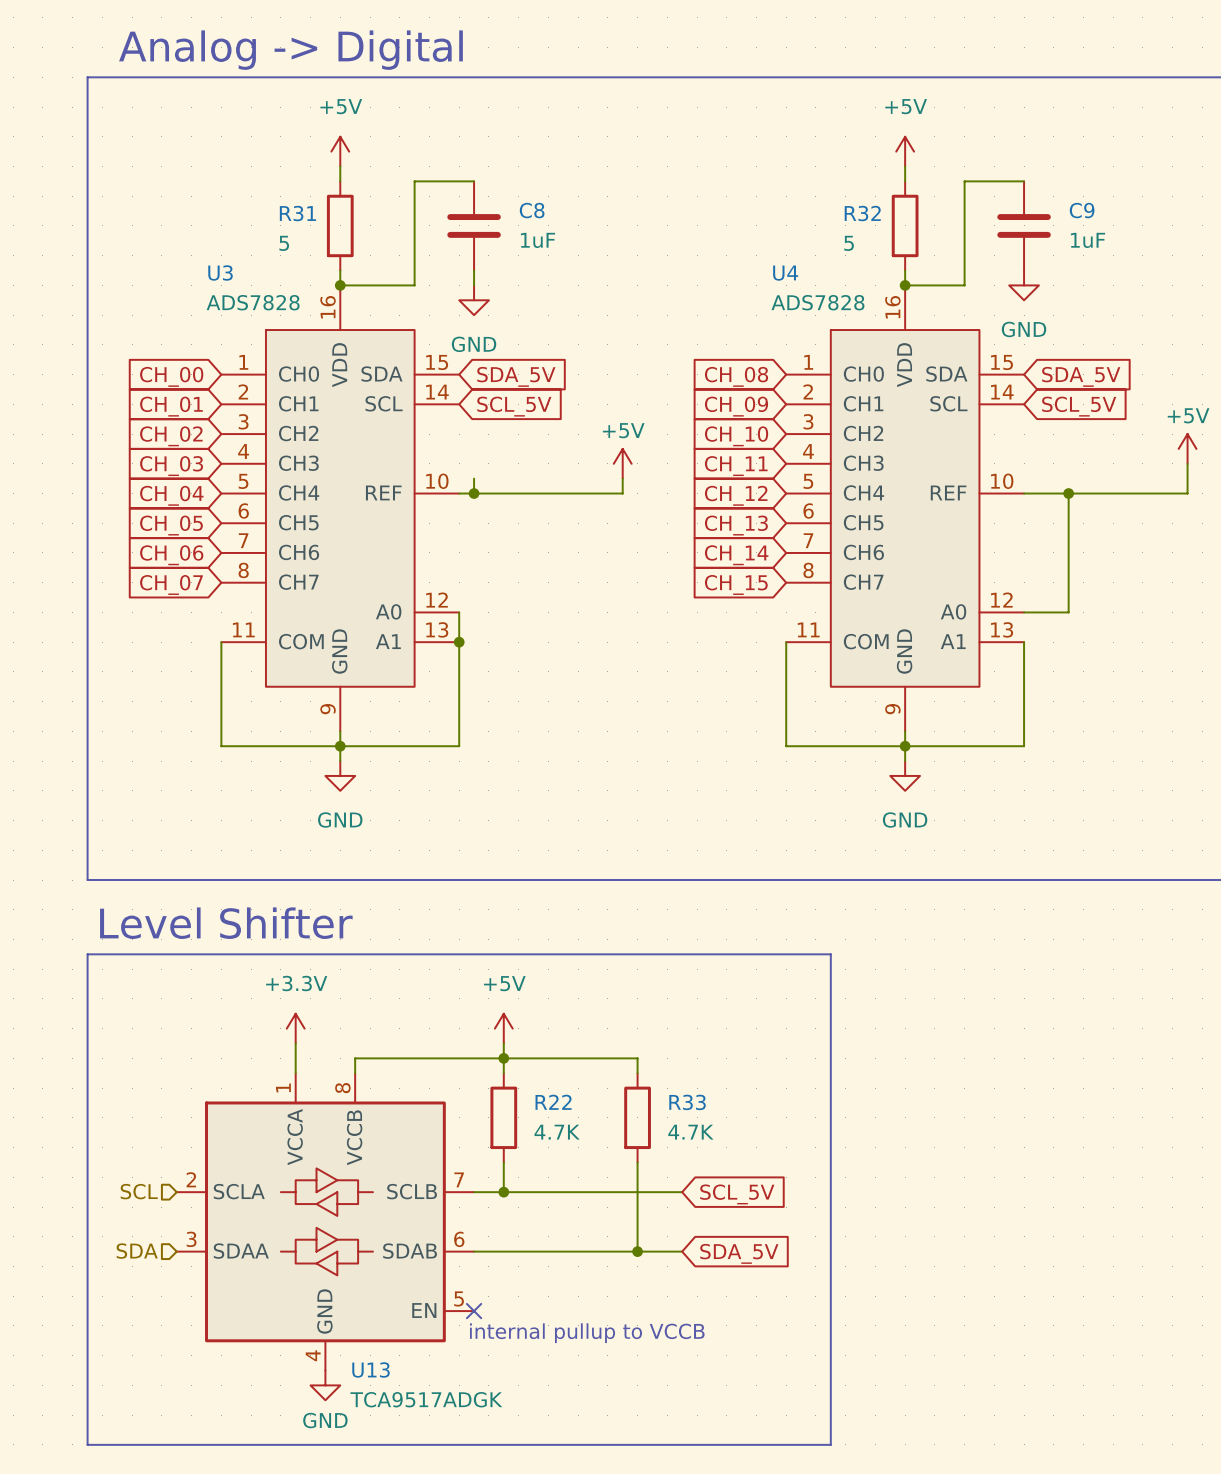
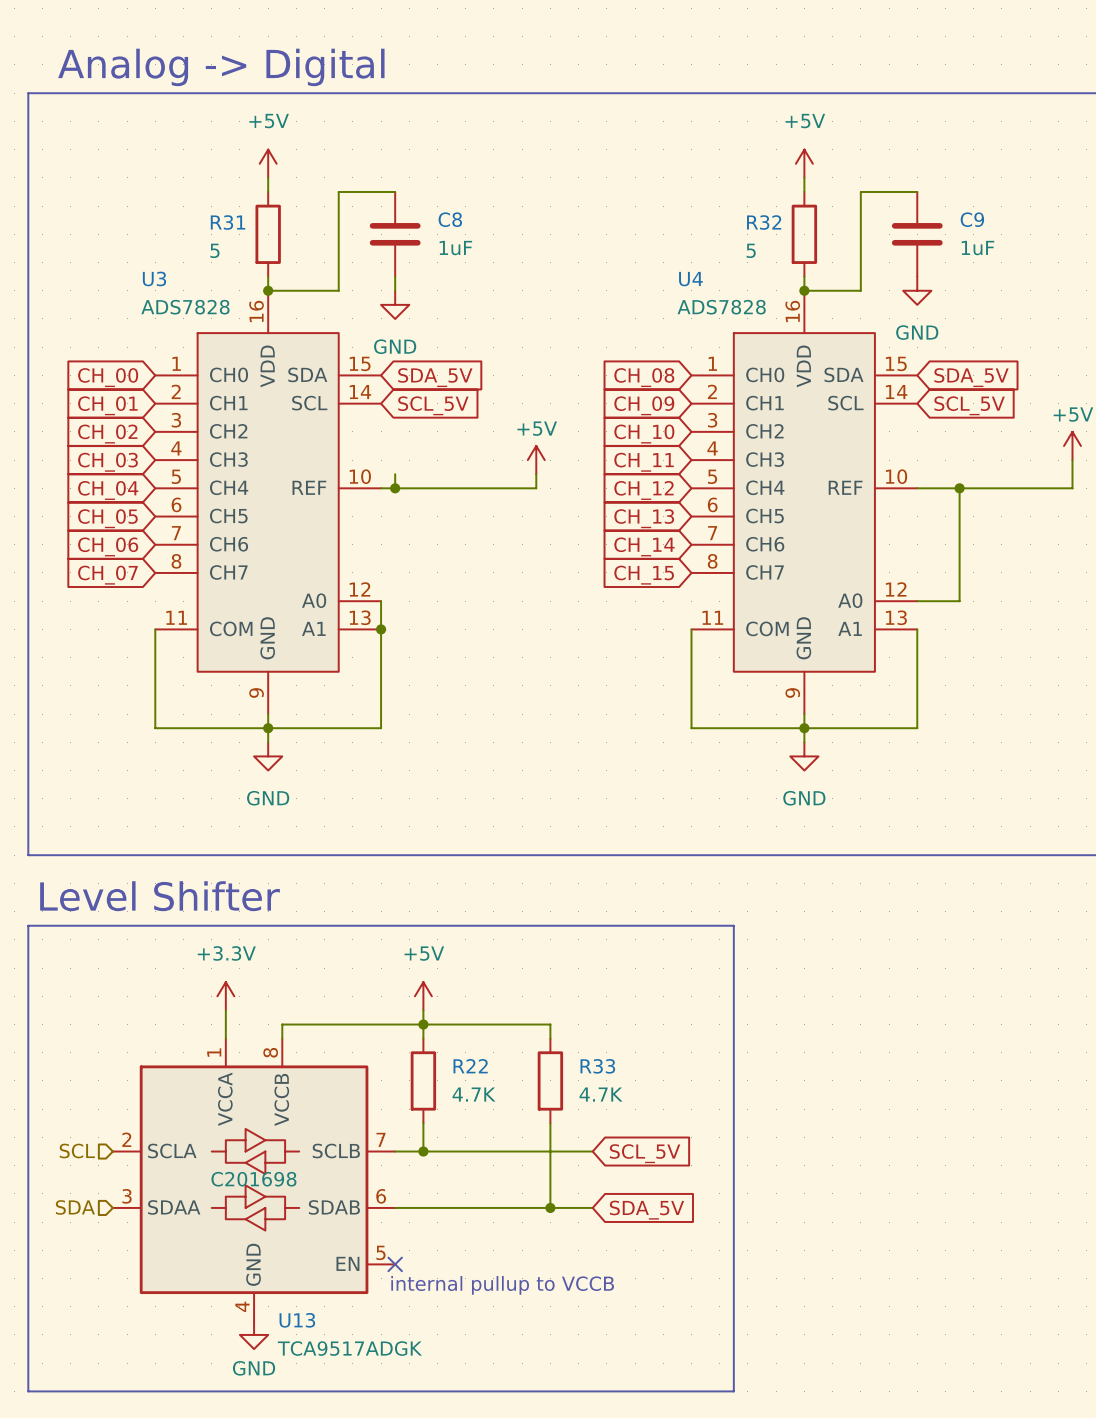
U13 text: none -> C201698 (253, 1179)

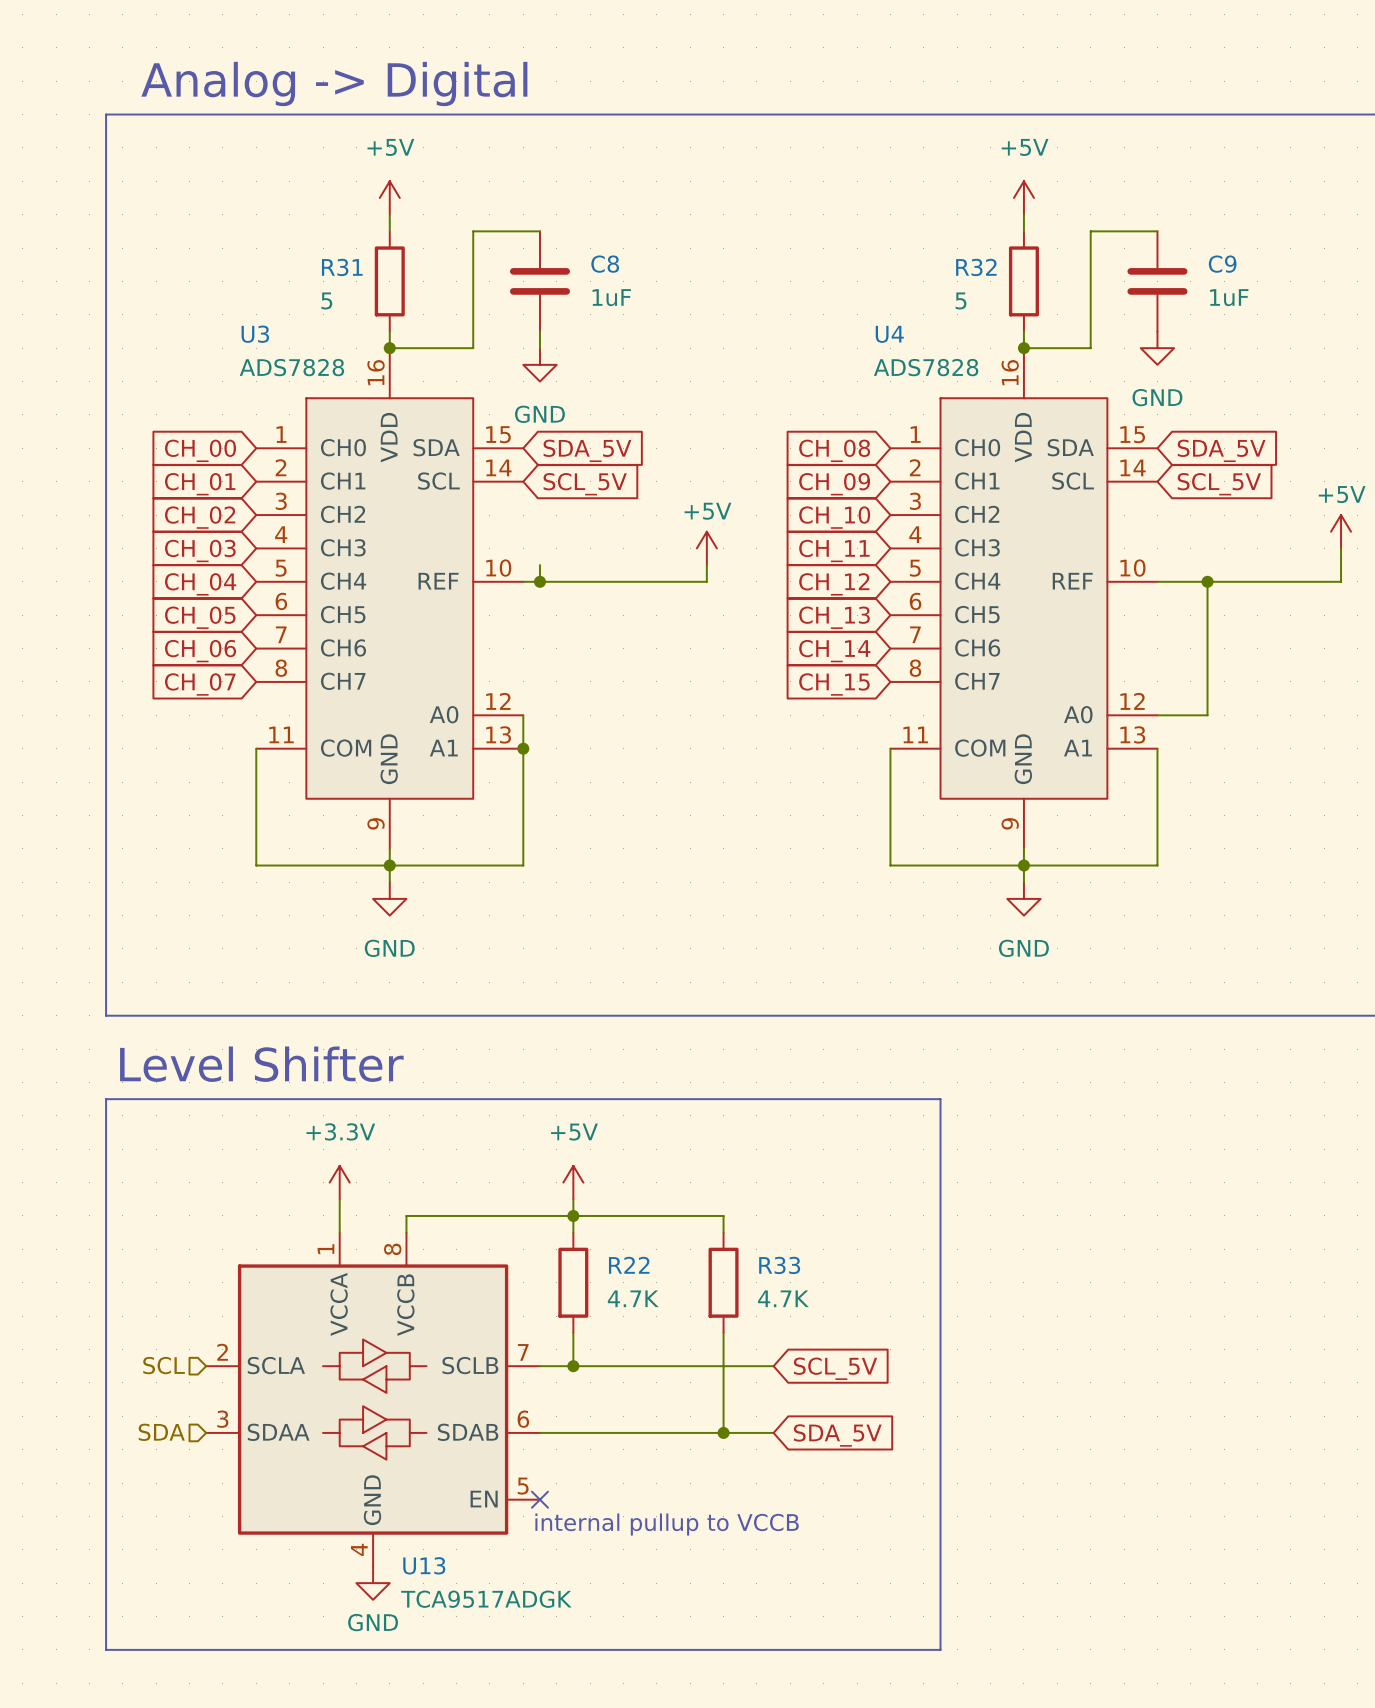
U13 text: C201698 (253, 1179) -> none

